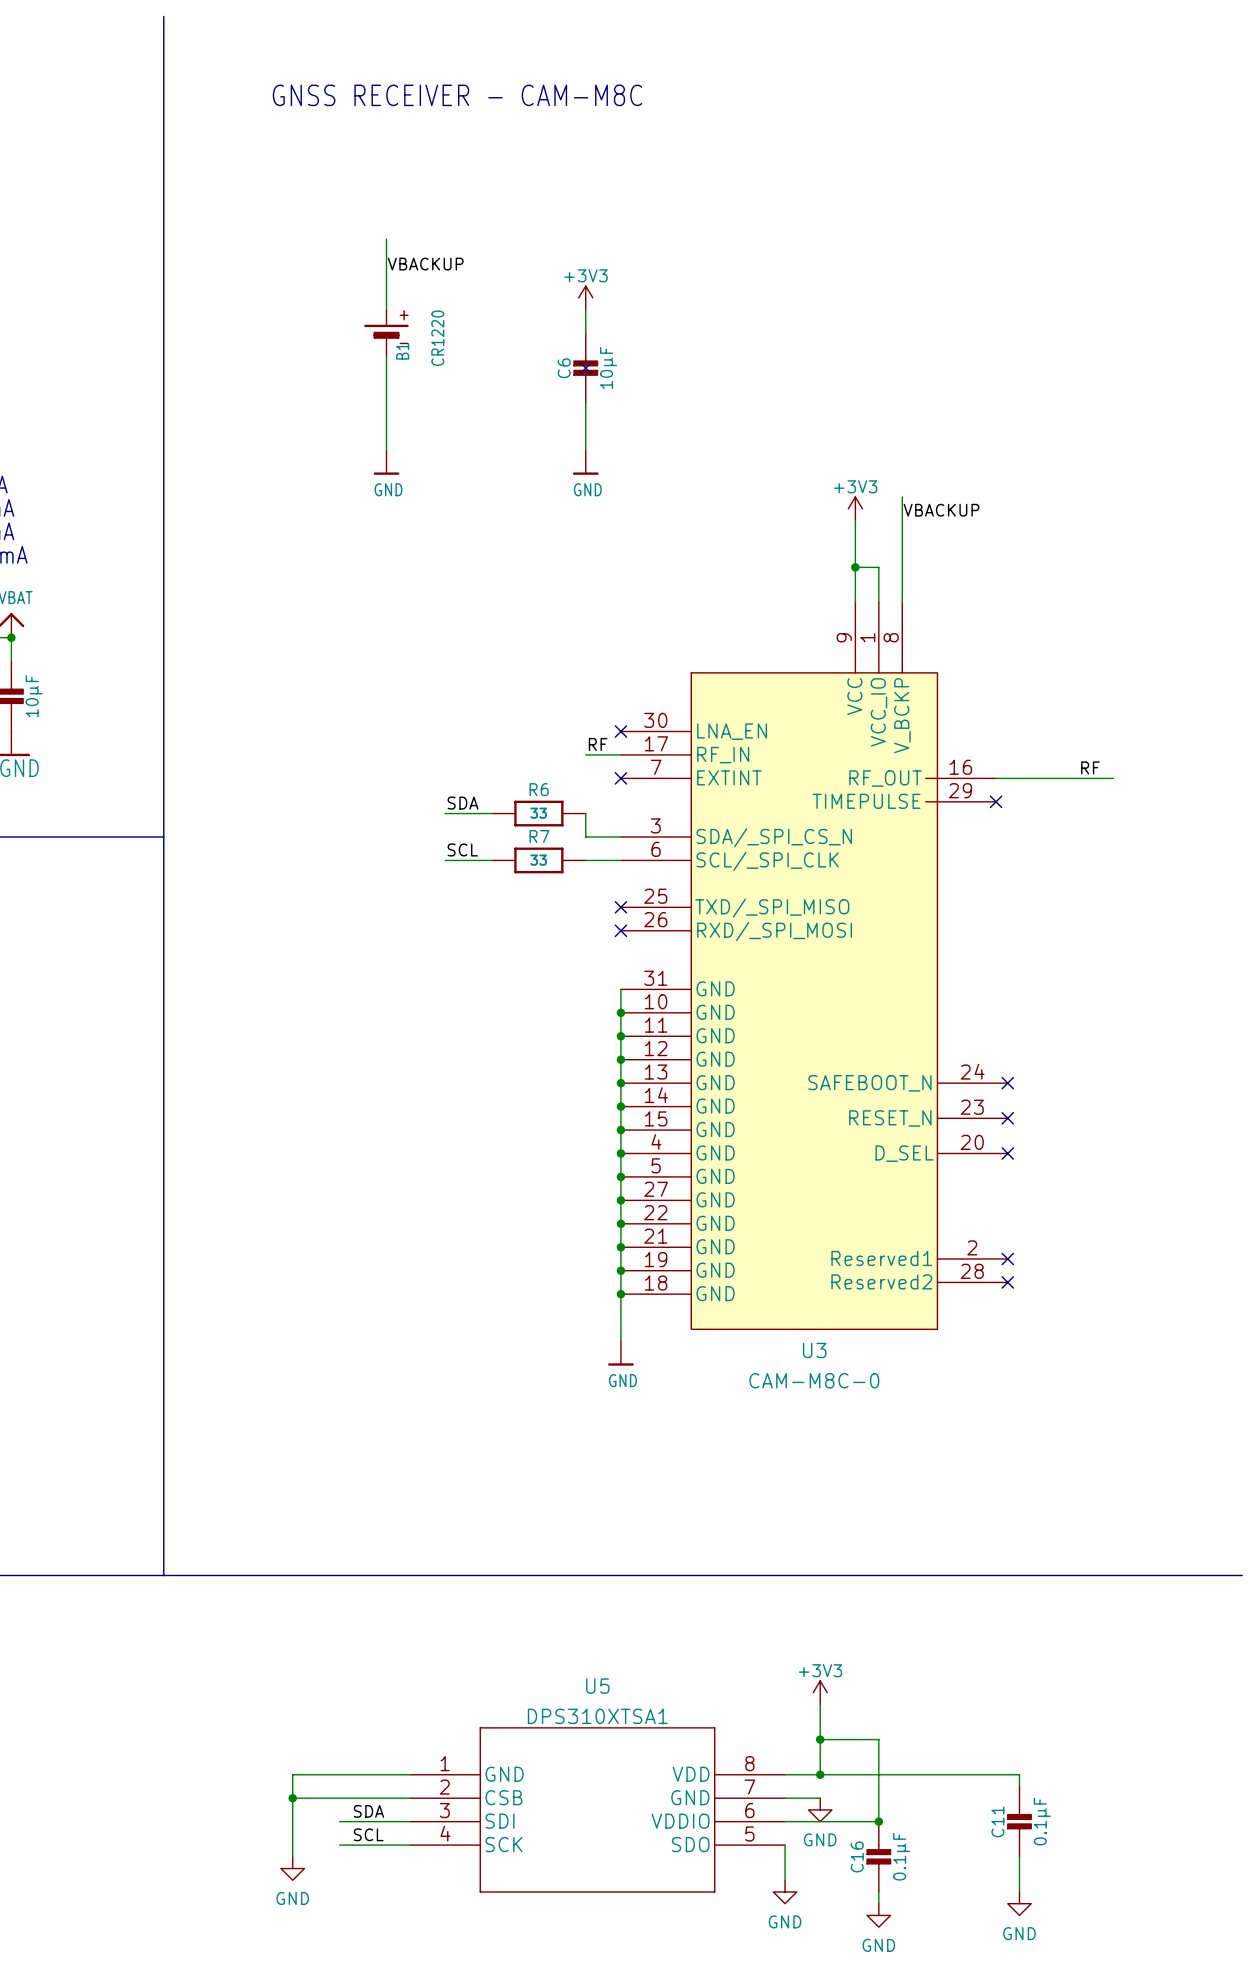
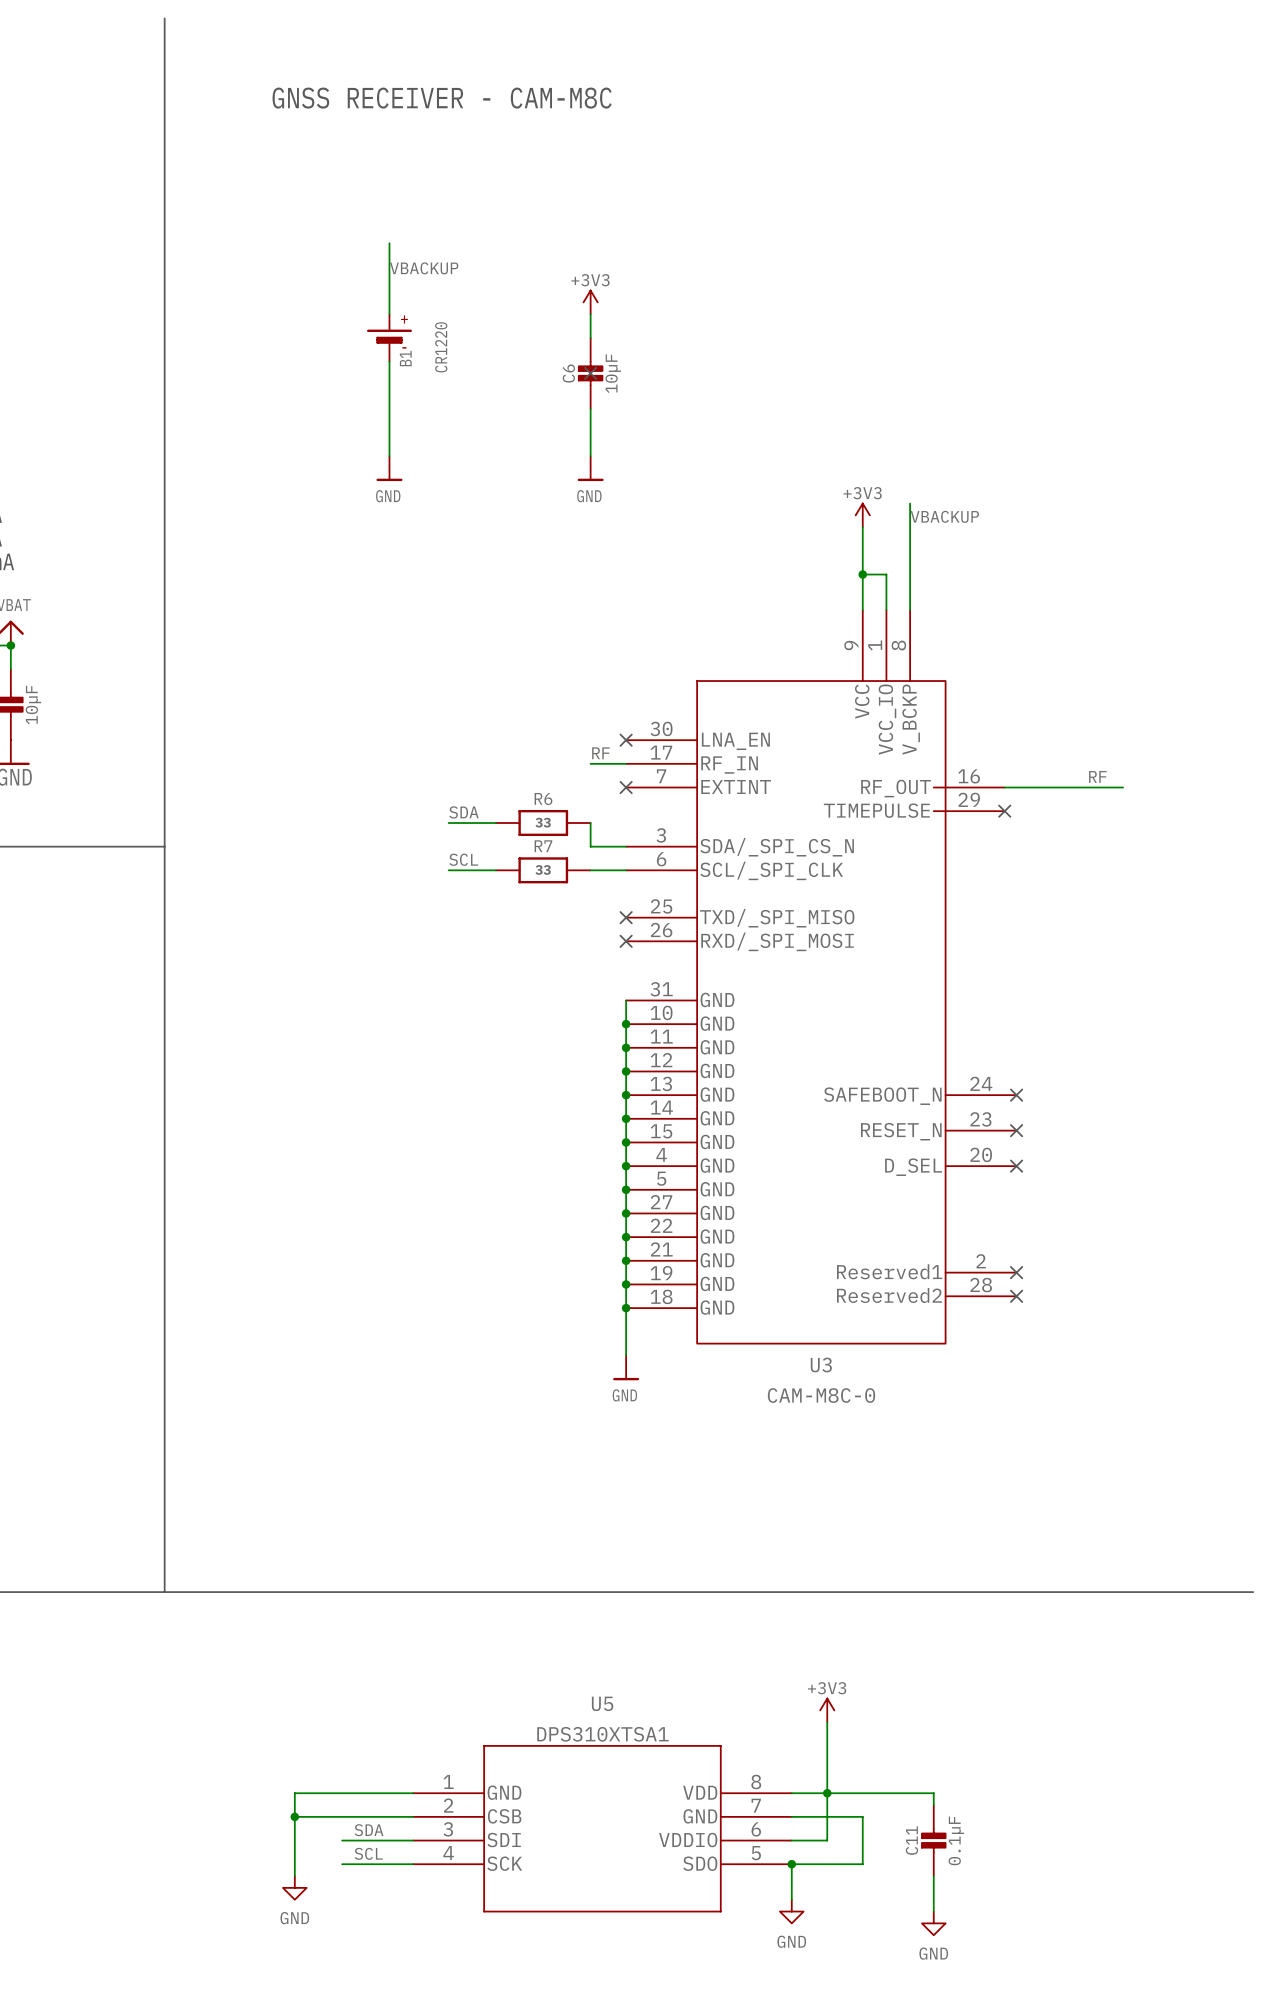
wire: (820, 1739) (878, 1739) (878, 1821) (820, 1821) -> (827, 1793) (827, 1840)
junction: (820, 1739) -> none
wire: (925, 1774) (1019, 1774) (1019, 1786) -> (933, 1793) (933, 1805)
wire: none -> (827, 1816) (862, 1816) (862, 1864) (791, 1864)
power symbol: GND (820, 1809) -> none
junction: (878, 1821) -> none
C11 position: (1019, 1821) -> (933, 1840)
junction: none -> (791, 1864)
C16: 0.1µF (878, 1856) -> none
wire: (1019, 1856) (1019, 1891) -> (933, 1876) (933, 1911)
wire: (878, 1891) (878, 1903) -> none
power symbol: none -> GND (933, 1923)
power symbol: GND (1019, 1903) -> none
power symbol: GND (878, 1915) -> none

